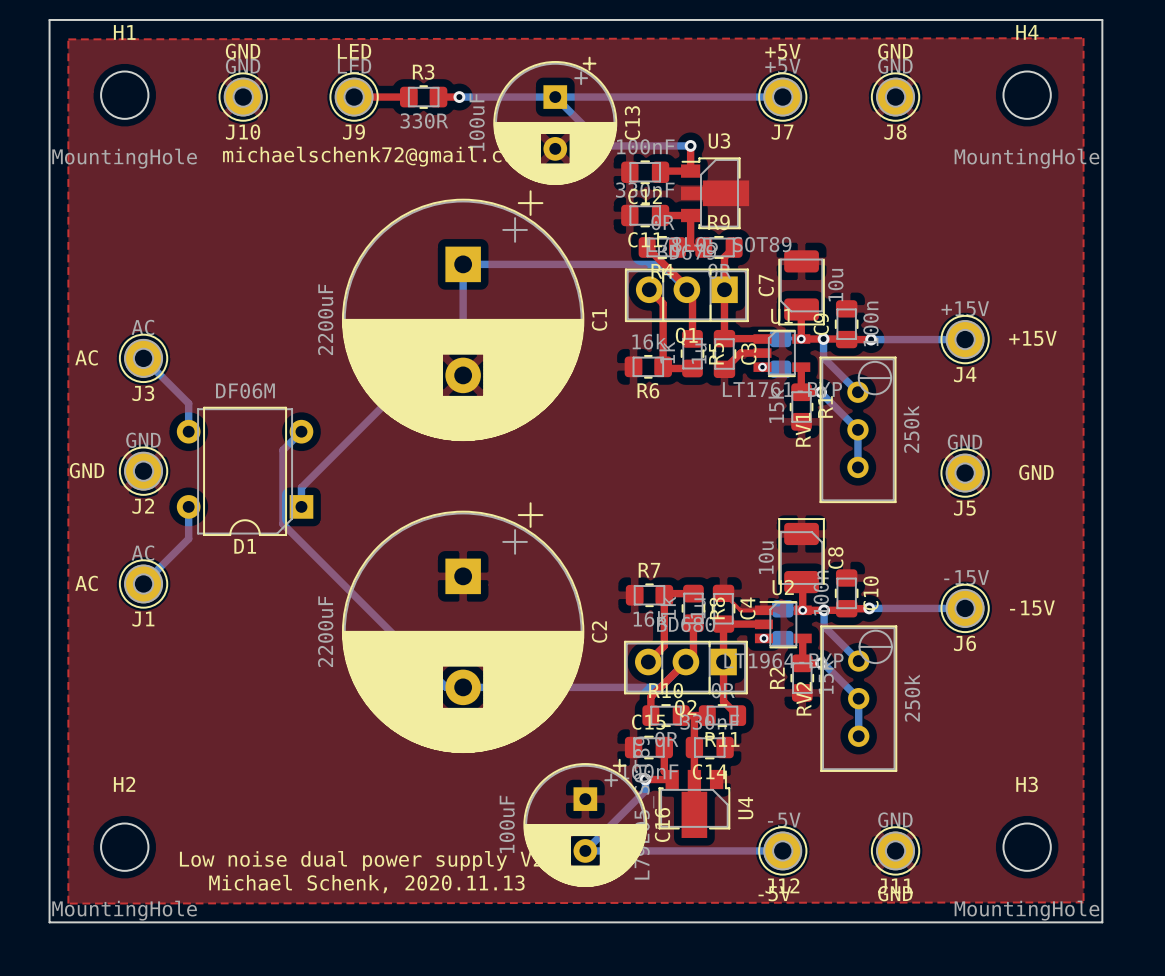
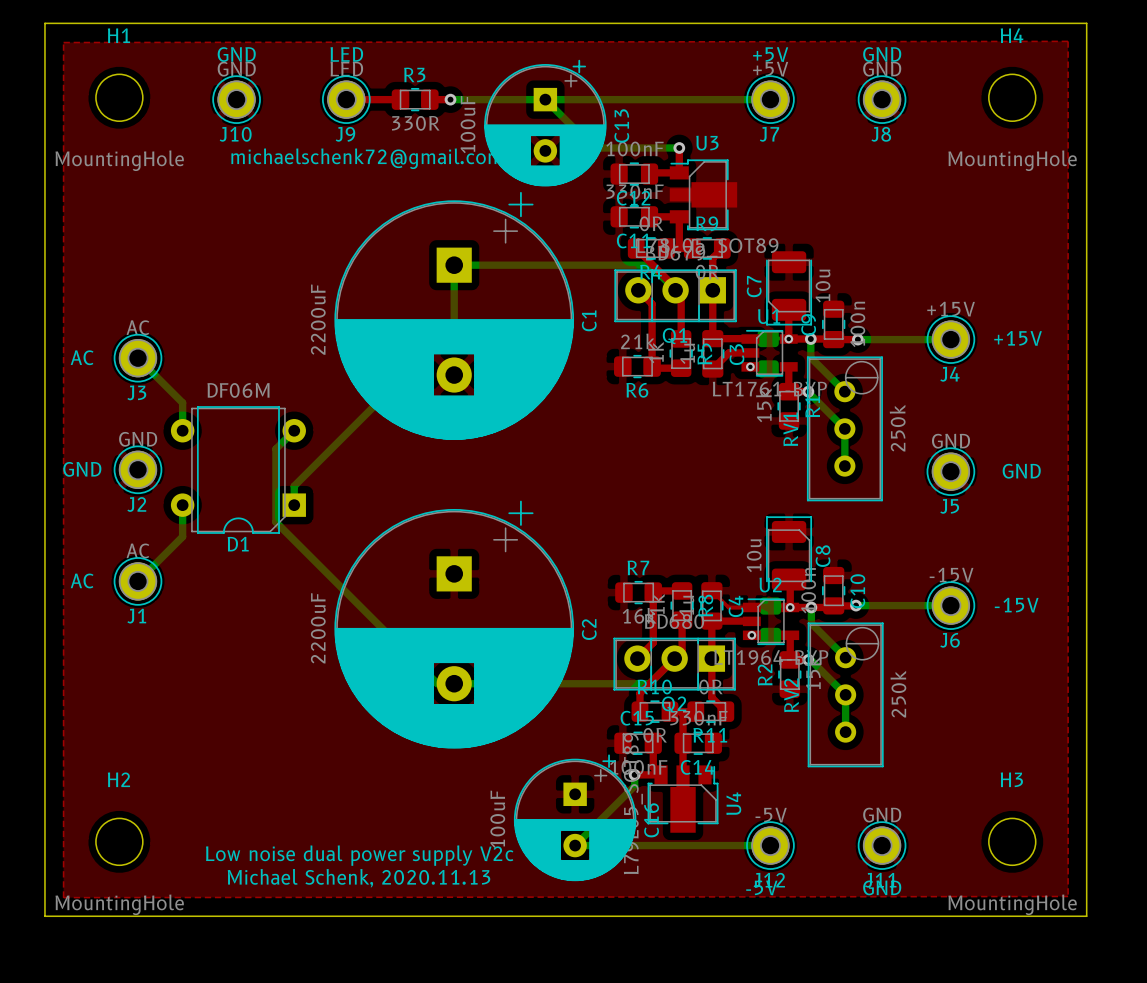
R6 value: 16k (649, 341) -> 21k (638, 341)

